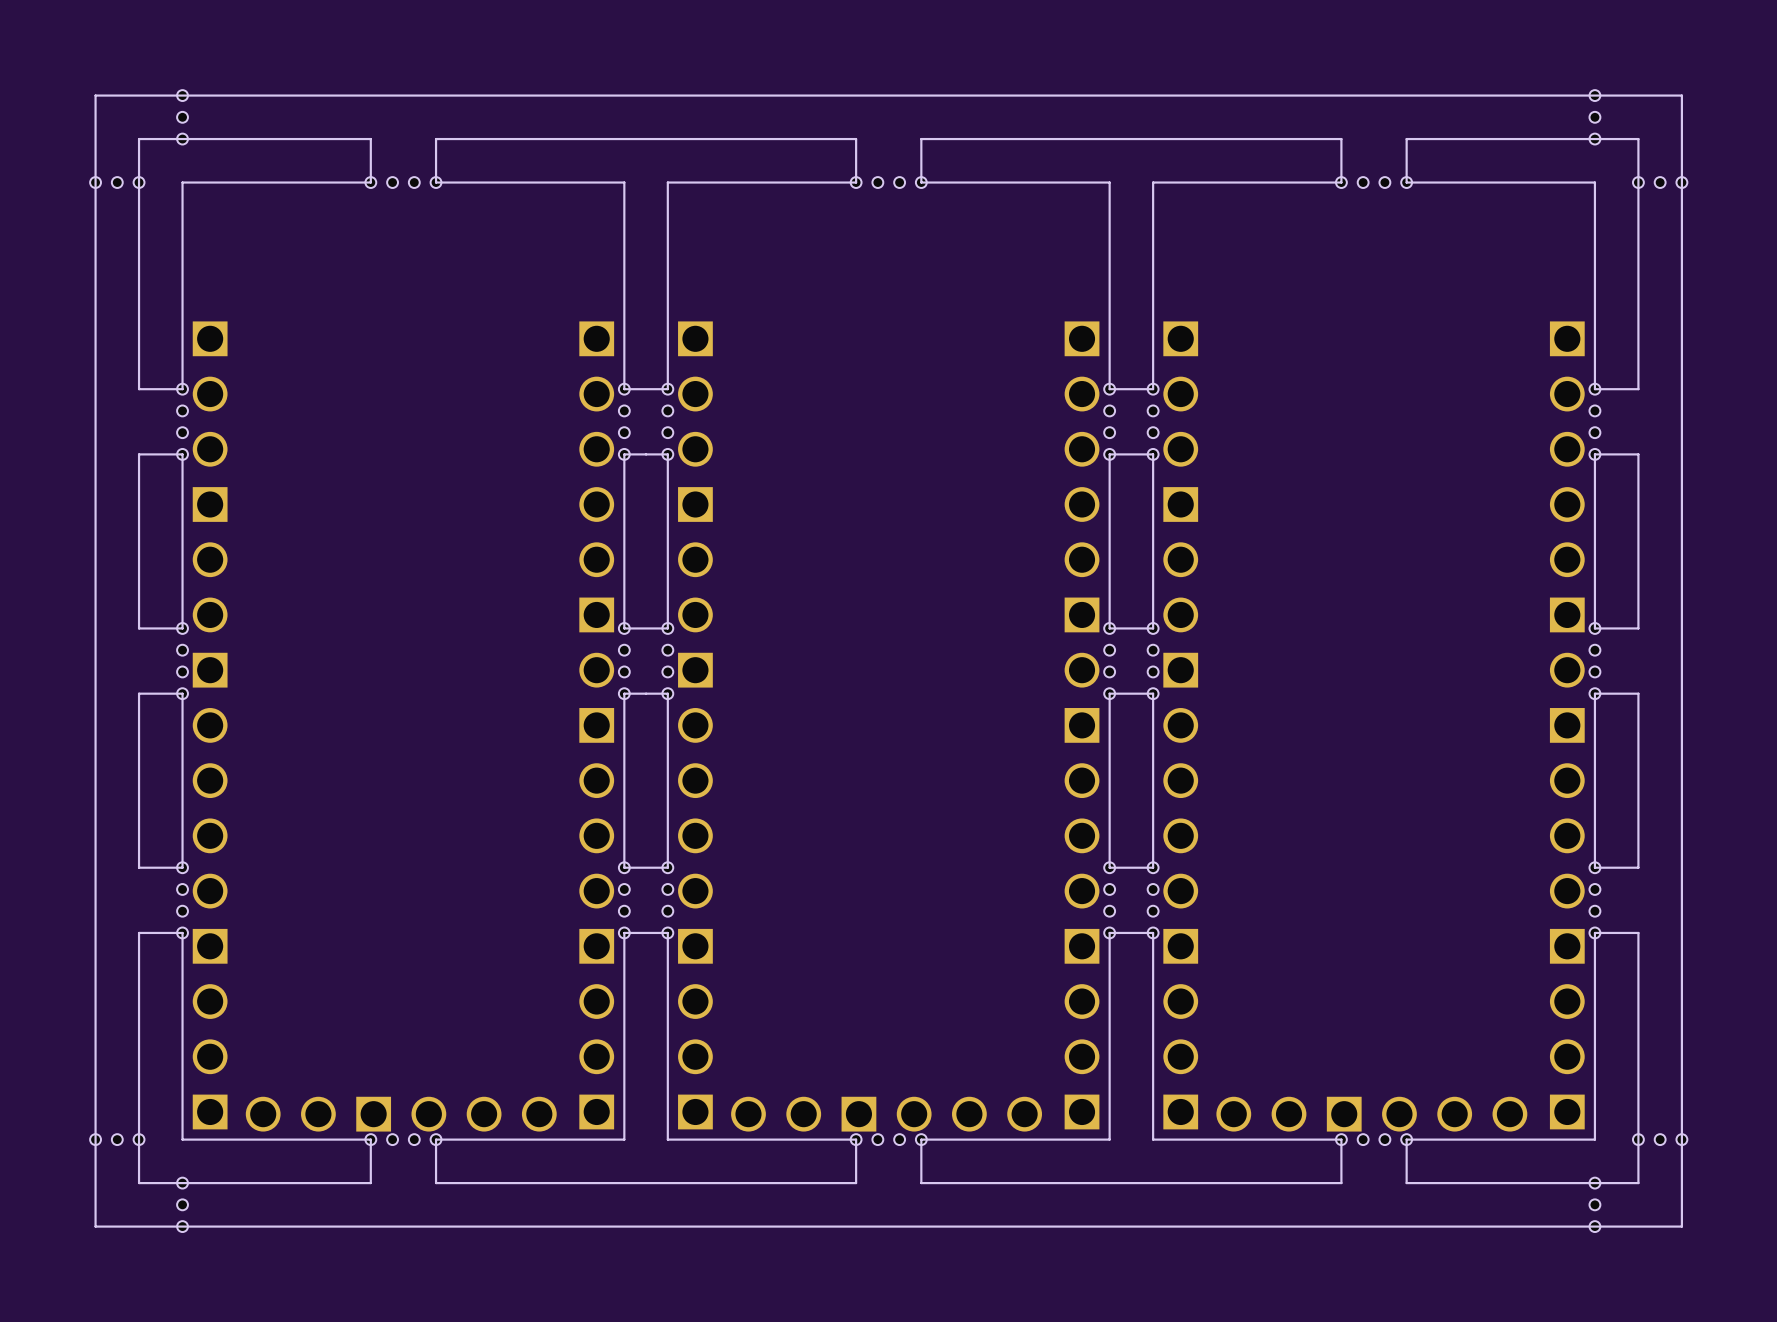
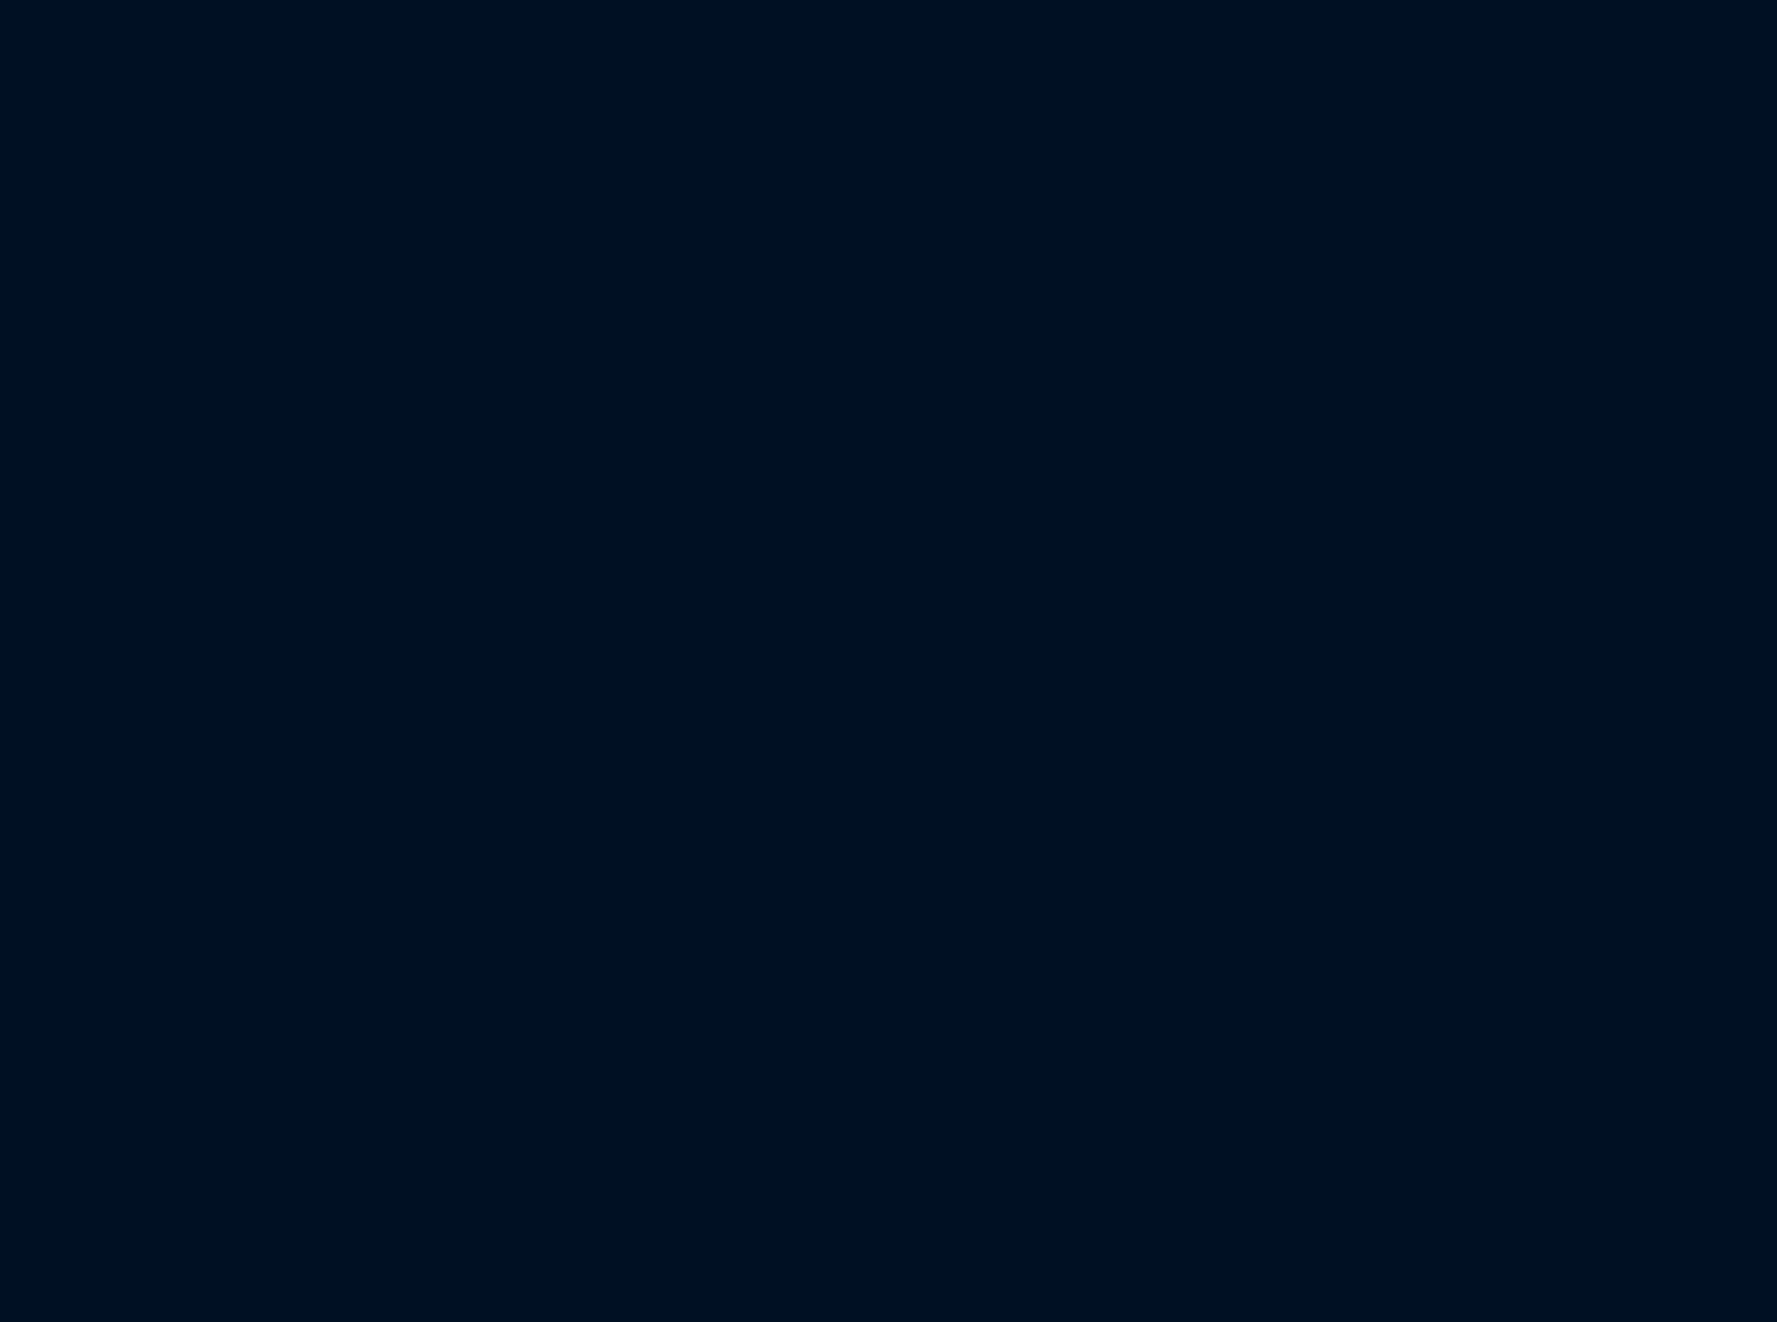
part: (182, 95) -> none
part: (1594, 95) -> none
board edge: (1681, 95) (95, 95) (95, 1226) (1681, 1226) (1681, 95) -> none
part: (182, 117) -> none
part: (1594, 117) -> none
part: (182, 139) -> none
board edge: (370, 139) (370, 182) (182, 182) (182, 389) (139, 389) (139, 139) (370, 139) -> none
board edge: (856, 139) (856, 182) (667, 182) (667, 389) (624, 389) (624, 182) (436, 182) (436, 139) (856, 139) -> none
board edge: (1341, 139) (1341, 182) (1153, 182) (1153, 389) (1109, 389) (1109, 182) (921, 182) (921, 139) (1341, 139) -> none
part: (1594, 139) -> none
board edge: (1638, 139) (1638, 389) (1594, 389) (1594, 182) (1406, 182) (1406, 139) (1638, 139) -> none
part: (95, 182) -> none
part: (117, 182) -> none
part: (139, 182) -> none
part: (370, 182) -> none
part: (392, 182) -> none
part: (414, 182) -> none
part: (436, 182) -> none
part: (856, 182) -> none
part: (877, 182) -> none
part: (899, 182) -> none
part: (921, 182) -> none
part: (1341, 182) -> none
part: (1363, 182) -> none
part: (1384, 182) -> none
part: (1406, 182) -> none
part: (1638, 182) -> none
part: (1660, 182) -> none
part: (1681, 182) -> none
part: (182, 389) -> none
part: (624, 389) -> none
part: (667, 389) -> none
part: (1109, 389) -> none
part: (1153, 389) -> none
part: (1594, 389) -> none
part: (182, 410) -> none
part: (624, 410) -> none
part: (667, 410) -> none
part: (1109, 410) -> none
part: (1153, 410) -> none
part: (1594, 410) -> none
part: (182, 432) -> none
part: (624, 432) -> none
part: (667, 432) -> none
part: (1109, 432) -> none
part: (1153, 432) -> none
part: (1594, 432) -> none
board edge: (182, 454) (182, 628) (139, 628) (139, 454) (182, 454) -> none
part: (182, 454) -> none
part: (624, 454) -> none
board edge: (667, 454) (667, 628) (624, 628) (624, 454) (667, 454) -> none
part: (667, 454) -> none
part: (1109, 454) -> none
board edge: (1153, 454) (1153, 628) (1109, 628) (1109, 454) (1153, 454) -> none
part: (1153, 454) -> none
part: (1594, 454) -> none
board edge: (1638, 454) (1638, 628) (1594, 628) (1594, 454) (1638, 454) -> none
part: (182, 628) -> none
part: (624, 628) -> none
part: (667, 628) -> none
part: (1109, 628) -> none
part: (1153, 628) -> none
part: (1594, 628) -> none
part: (182, 650) -> none
part: (624, 650) -> none
part: (667, 650) -> none
part: (1109, 650) -> none
part: (1153, 650) -> none
part: (1594, 650) -> none
part: (182, 671) -> none
part: (624, 671) -> none
part: (667, 671) -> none
part: (1109, 671) -> none
part: (1153, 671) -> none
part: (1594, 671) -> none
board edge: (182, 693) (182, 867) (139, 867) (139, 693) (182, 693) -> none
part: (182, 693) -> none
part: (624, 693) -> none
board edge: (667, 693) (624, 693) (624, 867) (667, 867) (667, 693) -> none
part: (667, 693) -> none
part: (1109, 693) -> none
board edge: (1153, 693) (1109, 693) (1109, 867) (1153, 867) (1153, 693) -> none
part: (1153, 693) -> none
part: (1594, 693) -> none
board edge: (1638, 693) (1638, 867) (1594, 867) (1594, 693) (1638, 693) -> none
part: (210, 725) -> none
part: (596, 725) -> none
part: (695, 725) -> none
part: (1082, 725) -> none
part: (1180, 725) -> none
part: (1567, 725) -> none
part: (182, 867) -> none
part: (624, 867) -> none
part: (667, 867) -> none
part: (1109, 867) -> none
part: (1153, 867) -> none
part: (1594, 867) -> none
part: (182, 889) -> none
part: (624, 889) -> none
part: (667, 889) -> none
part: (1109, 889) -> none
part: (1153, 889) -> none
part: (1594, 889) -> none
part: (182, 911) -> none
part: (624, 911) -> none
part: (667, 911) -> none
part: (1109, 911) -> none
part: (1153, 911) -> none
part: (1594, 911) -> none
board edge: (182, 932) (182, 1139) (370, 1139) (370, 1183) (139, 1183) (139, 932) (182, 932) -> none
part: (182, 932) -> none
part: (624, 932) -> none
board edge: (667, 932) (624, 932) (624, 1139) (436, 1139) (436, 1183) (856, 1183) (856, 1139) (667, 1139) (667, 932) -> none
part: (667, 932) -> none
part: (1109, 932) -> none
board edge: (1153, 932) (1109, 932) (1109, 1139) (921, 1139) (921, 1183) (1341, 1183) (1341, 1139) (1153, 1139) (1153, 932) -> none
part: (1153, 932) -> none
part: (1594, 932) -> none
board edge: (1638, 932) (1638, 1183) (1406, 1183) (1406, 1139) (1594, 1139) (1594, 932) (1638, 932) -> none
part: (401, 1114) -> none
part: (886, 1114) -> none
part: (1371, 1114) -> none
part: (95, 1139) -> none
part: (117, 1139) -> none
part: (139, 1139) -> none
part: (370, 1139) -> none
part: (392, 1139) -> none
part: (414, 1139) -> none
part: (436, 1139) -> none
part: (856, 1139) -> none
part: (877, 1139) -> none
part: (899, 1139) -> none
part: (921, 1139) -> none
part: (1341, 1139) -> none
part: (1363, 1139) -> none
part: (1384, 1139) -> none
part: (1406, 1139) -> none
part: (1638, 1139) -> none
part: (1660, 1139) -> none
part: (1681, 1139) -> none
part: (182, 1183) -> none
part: (1594, 1183) -> none
part: (182, 1204) -> none
part: (1594, 1204) -> none
part: (182, 1226) -> none
part: (1594, 1226) -> none

